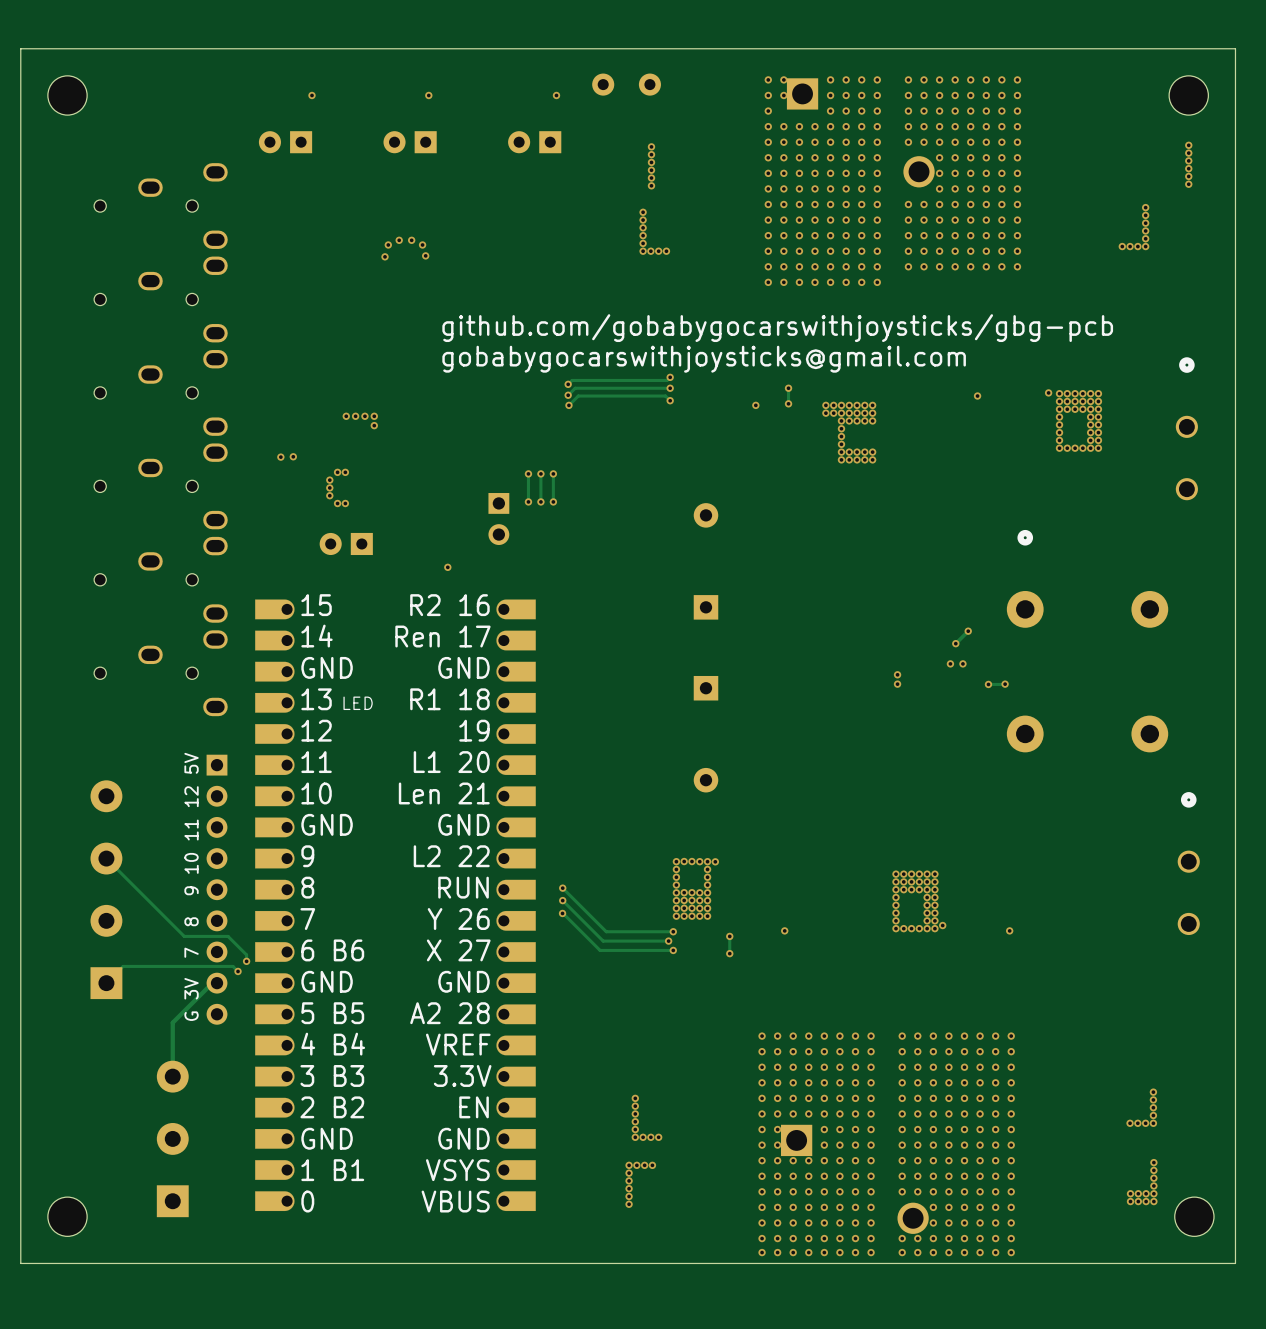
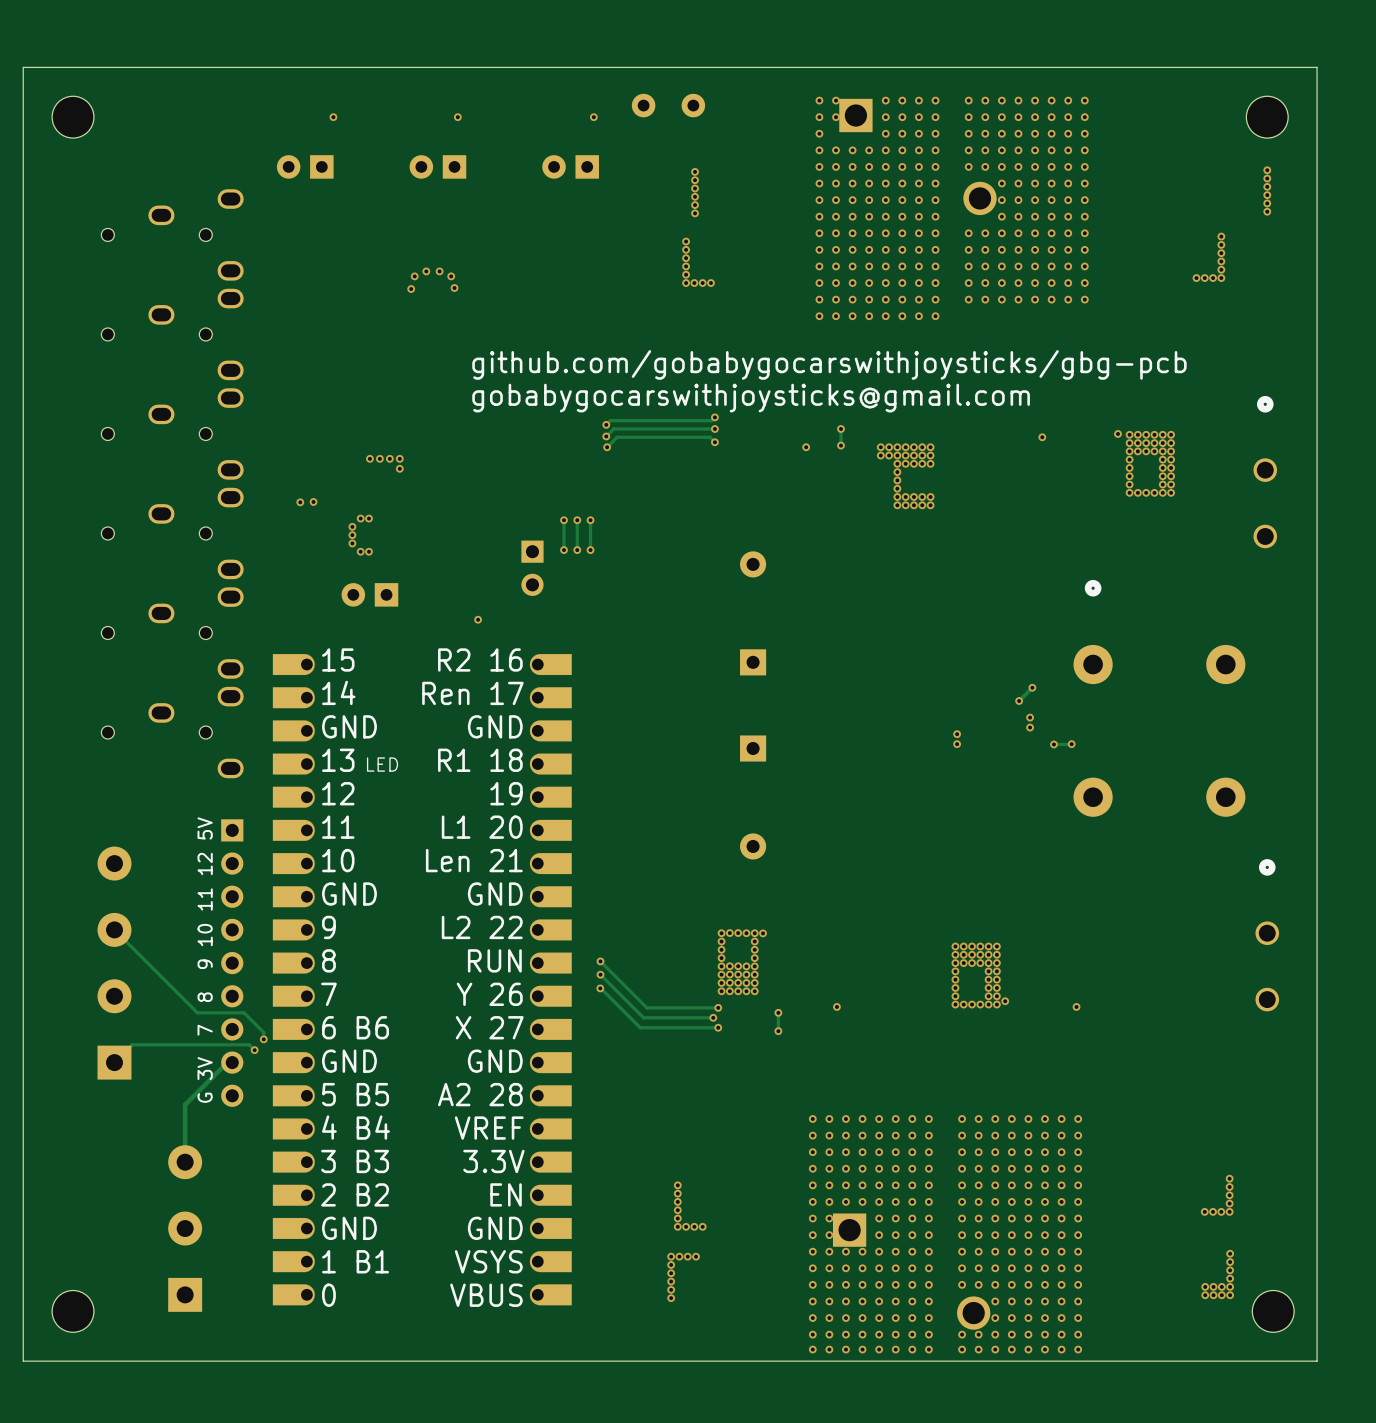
via: none -> (1030, 717)
via: (950, 663) -> none
via: (962, 663) -> none
via: none -> (1030, 727)

